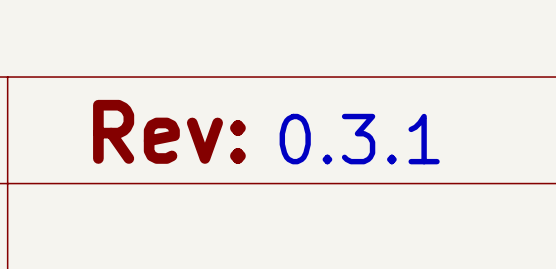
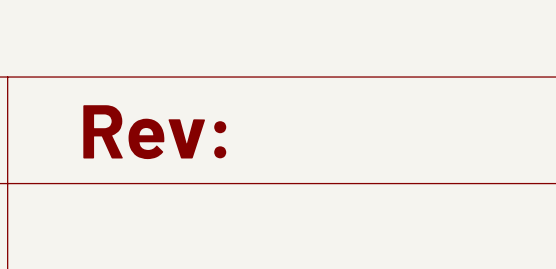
text: 0.3.1 (359, 139) -> none

